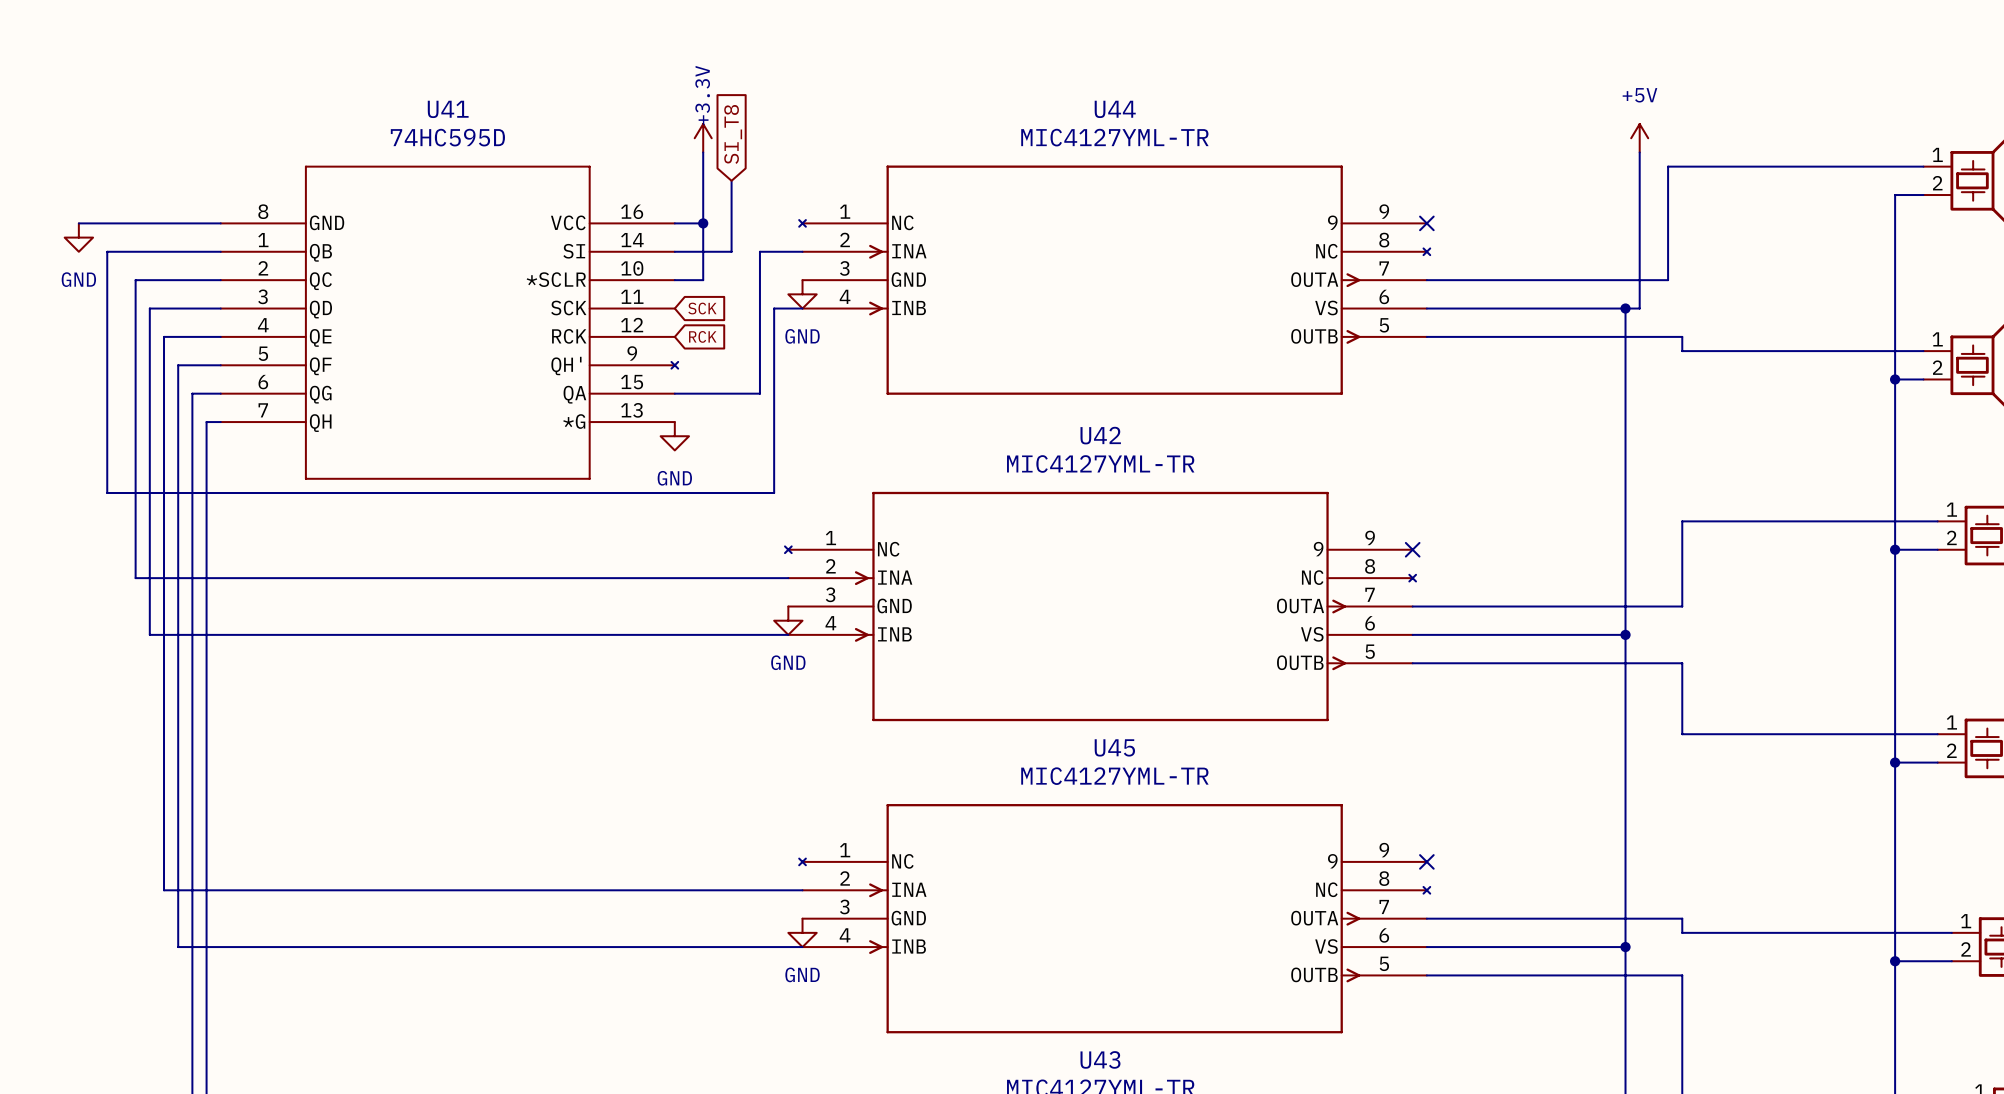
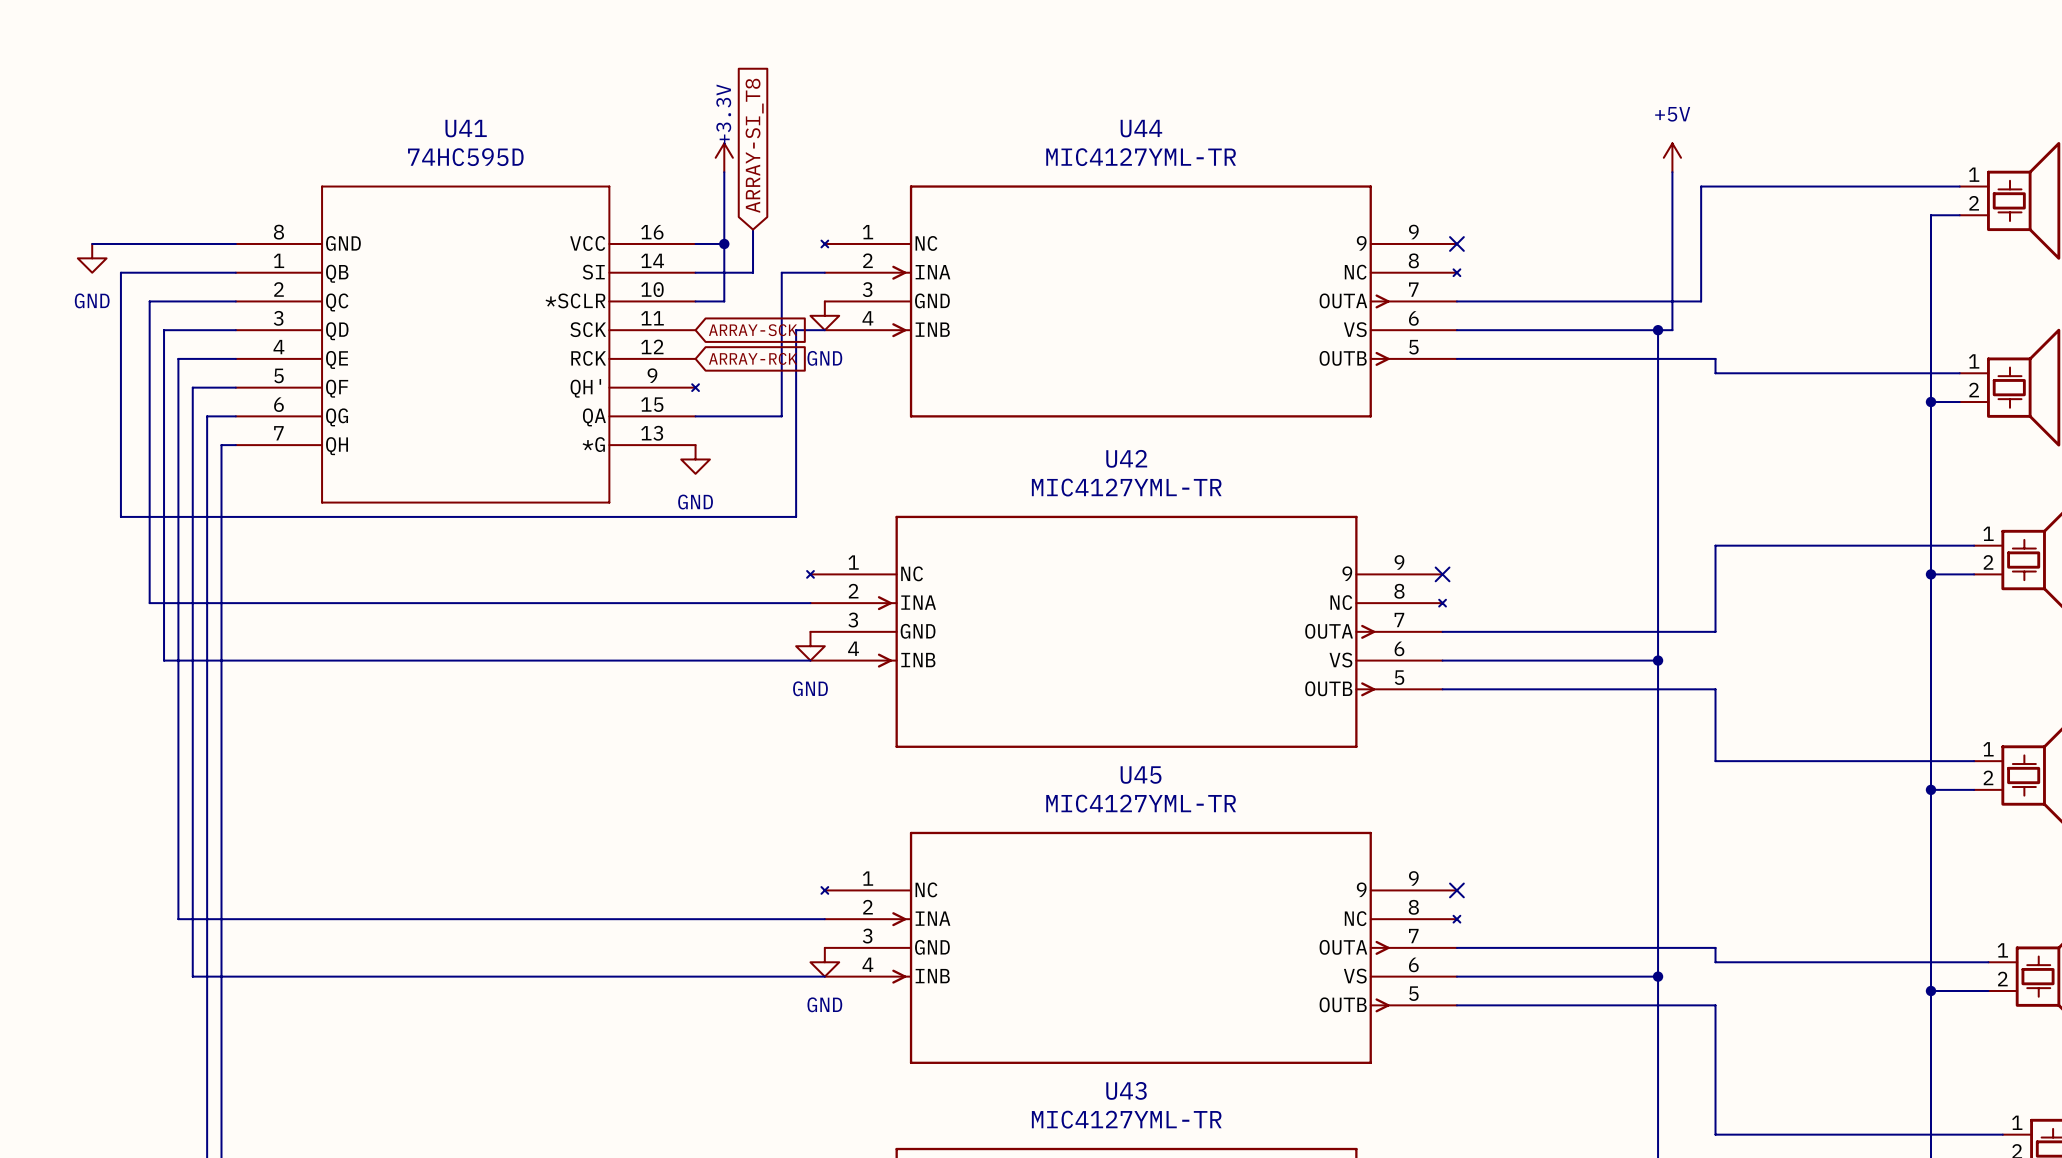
global label: SI_T8 (733, 134) -> ARRAY-SI_T8 (754, 145)
wire: (731, 180) (731, 209) -> none
global label: SCK (702, 308) -> ARRAY-SCK (753, 330)
global label: RCK (702, 336) -> ARRAY-RCK (753, 358)

